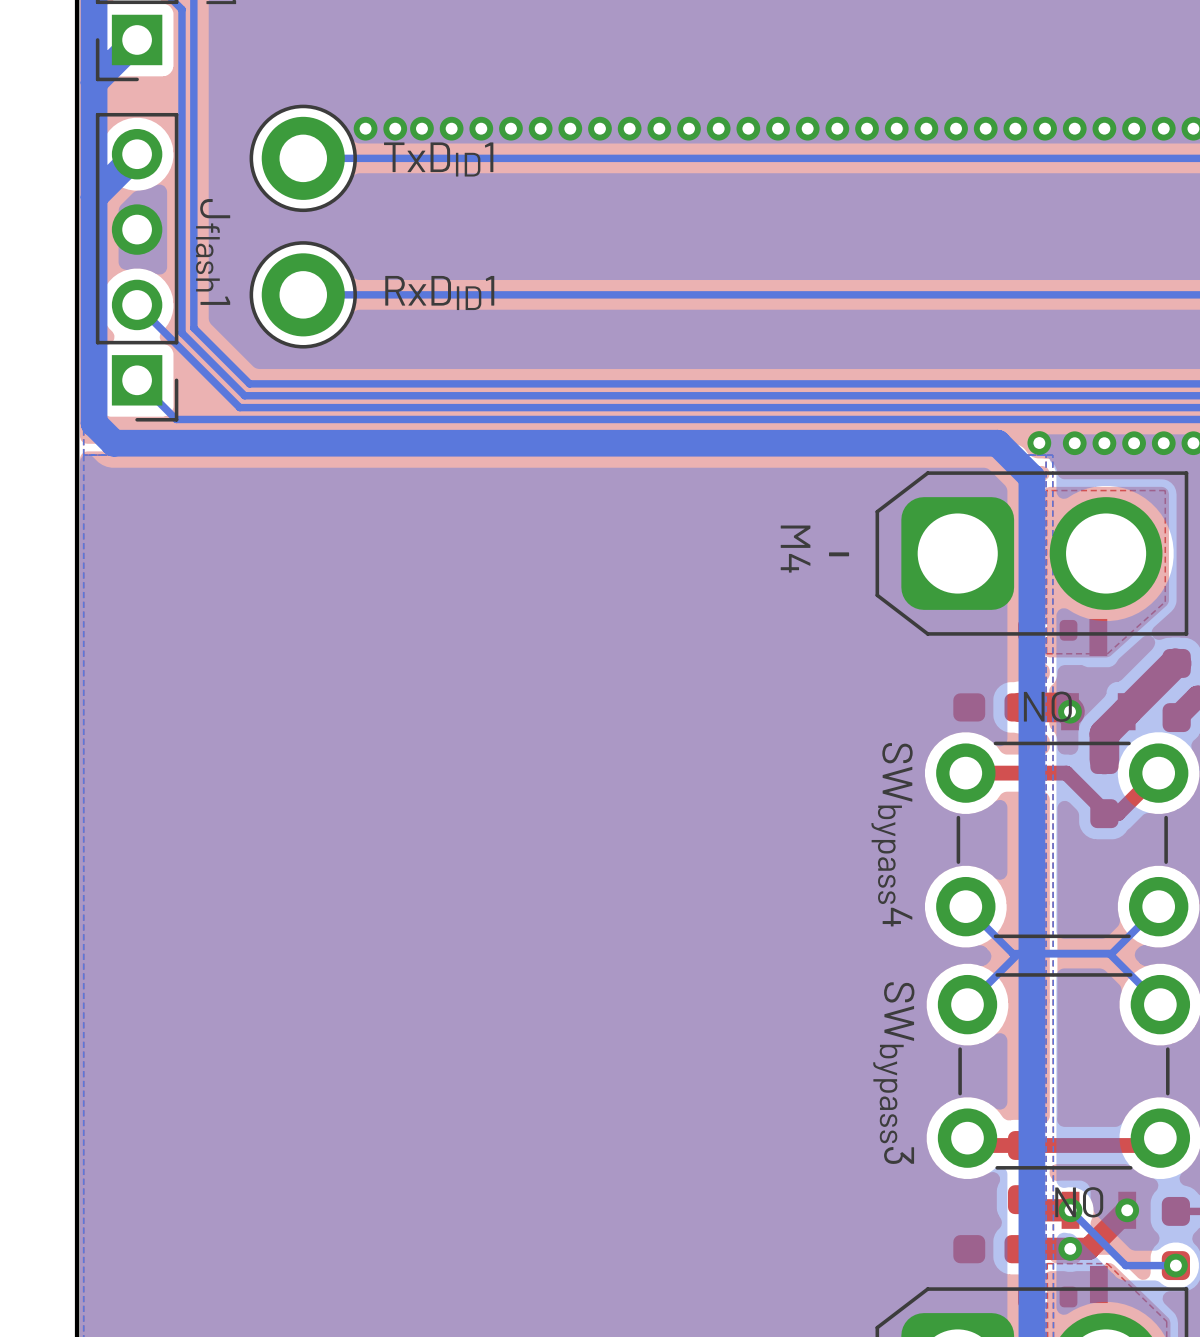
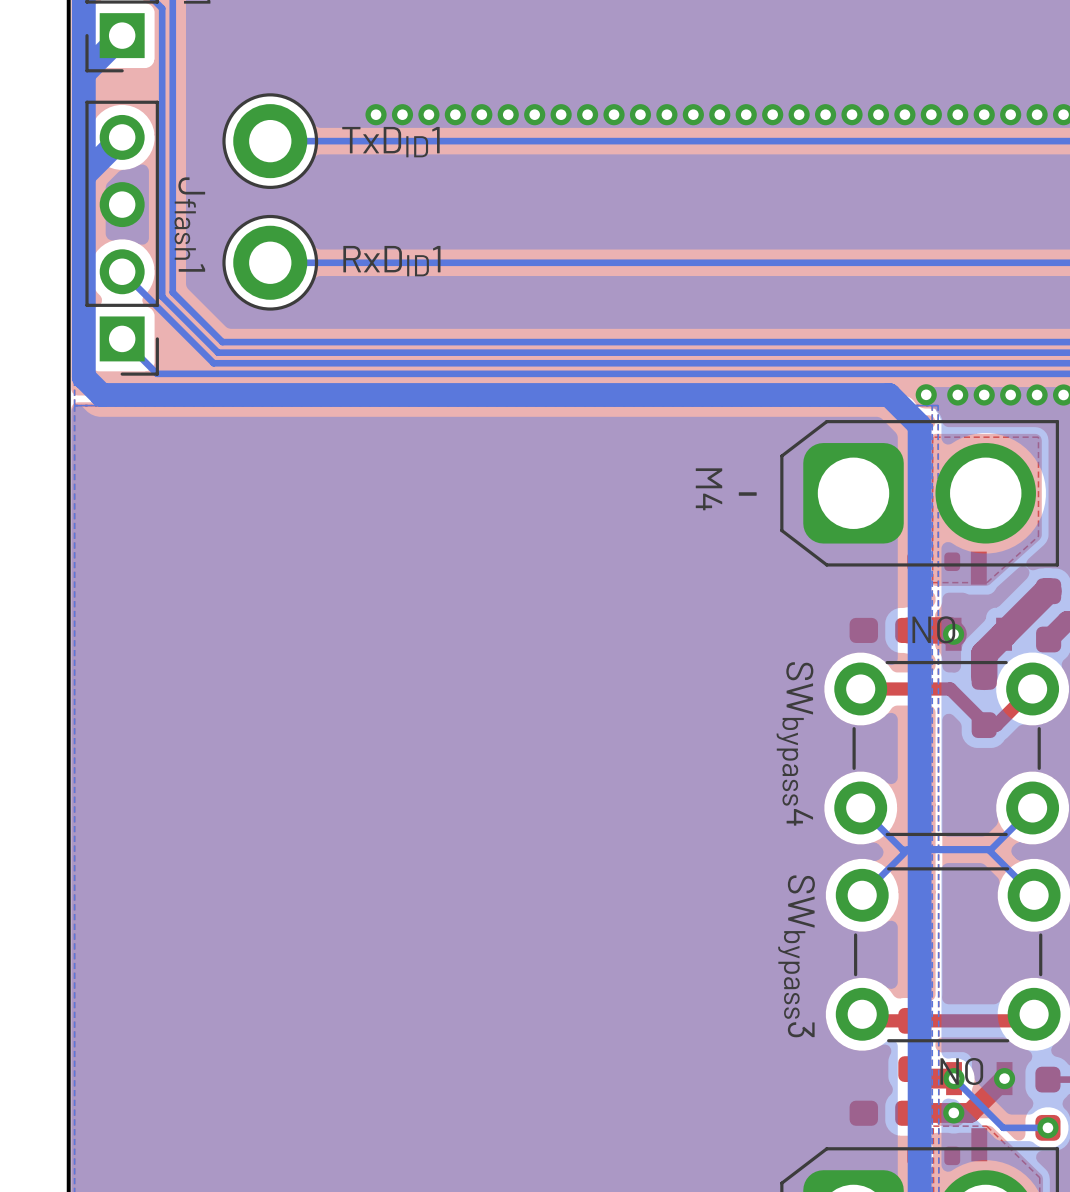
via: (365, 128) -> none
via: (395, 128) -> none

